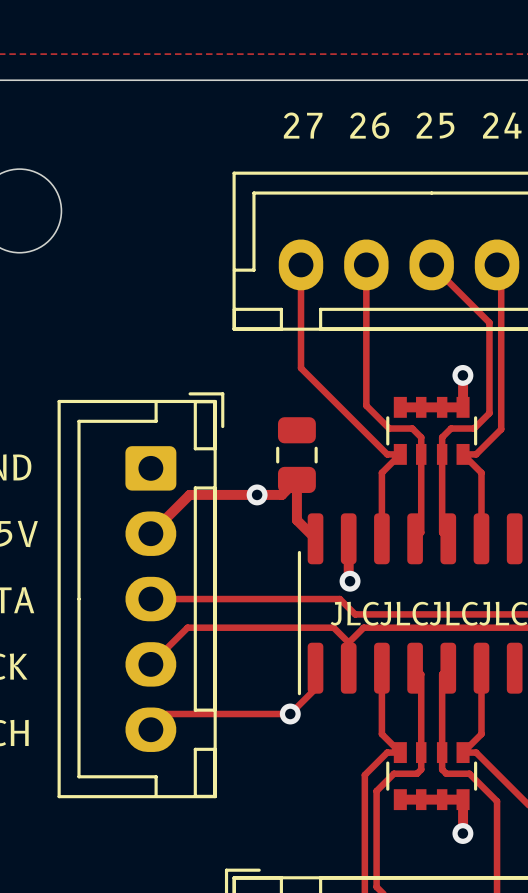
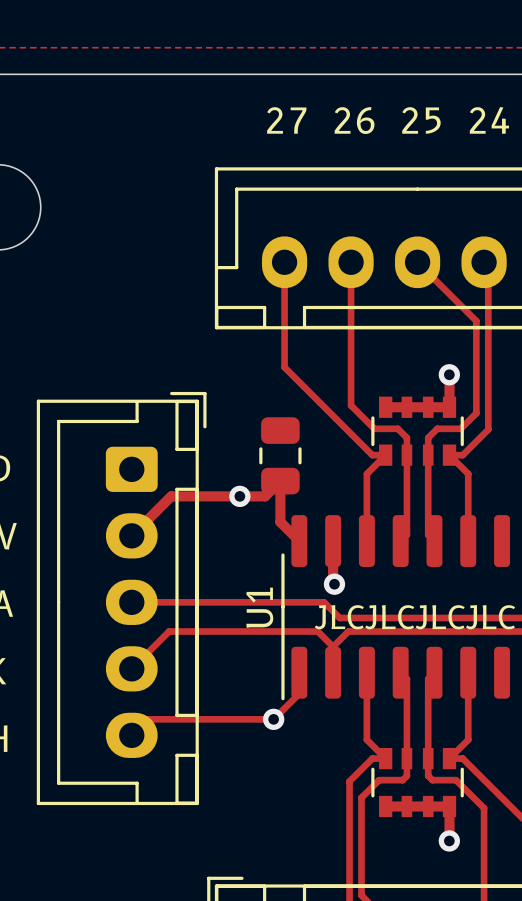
U1 name: none -> U1 (259, 607)

